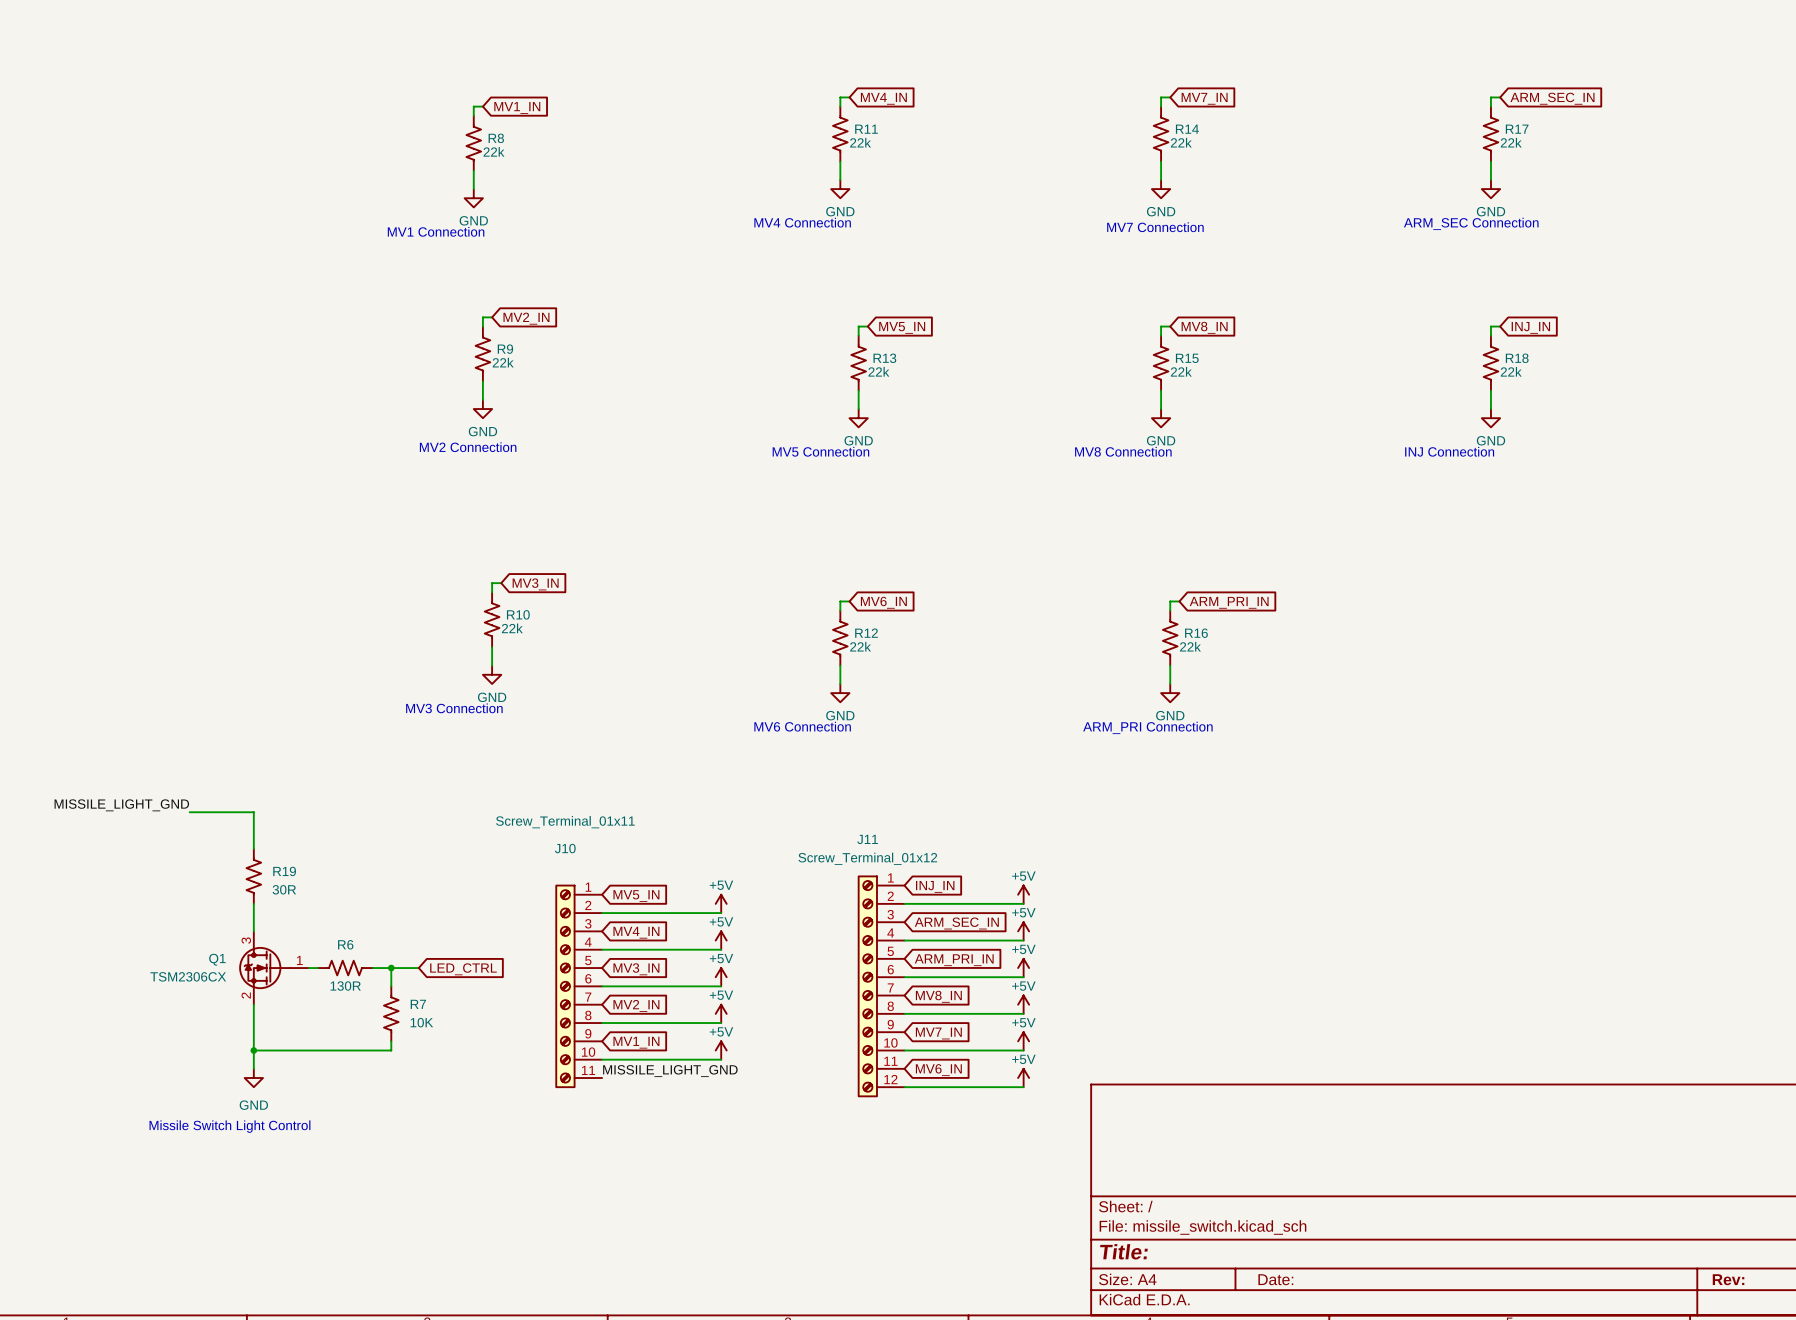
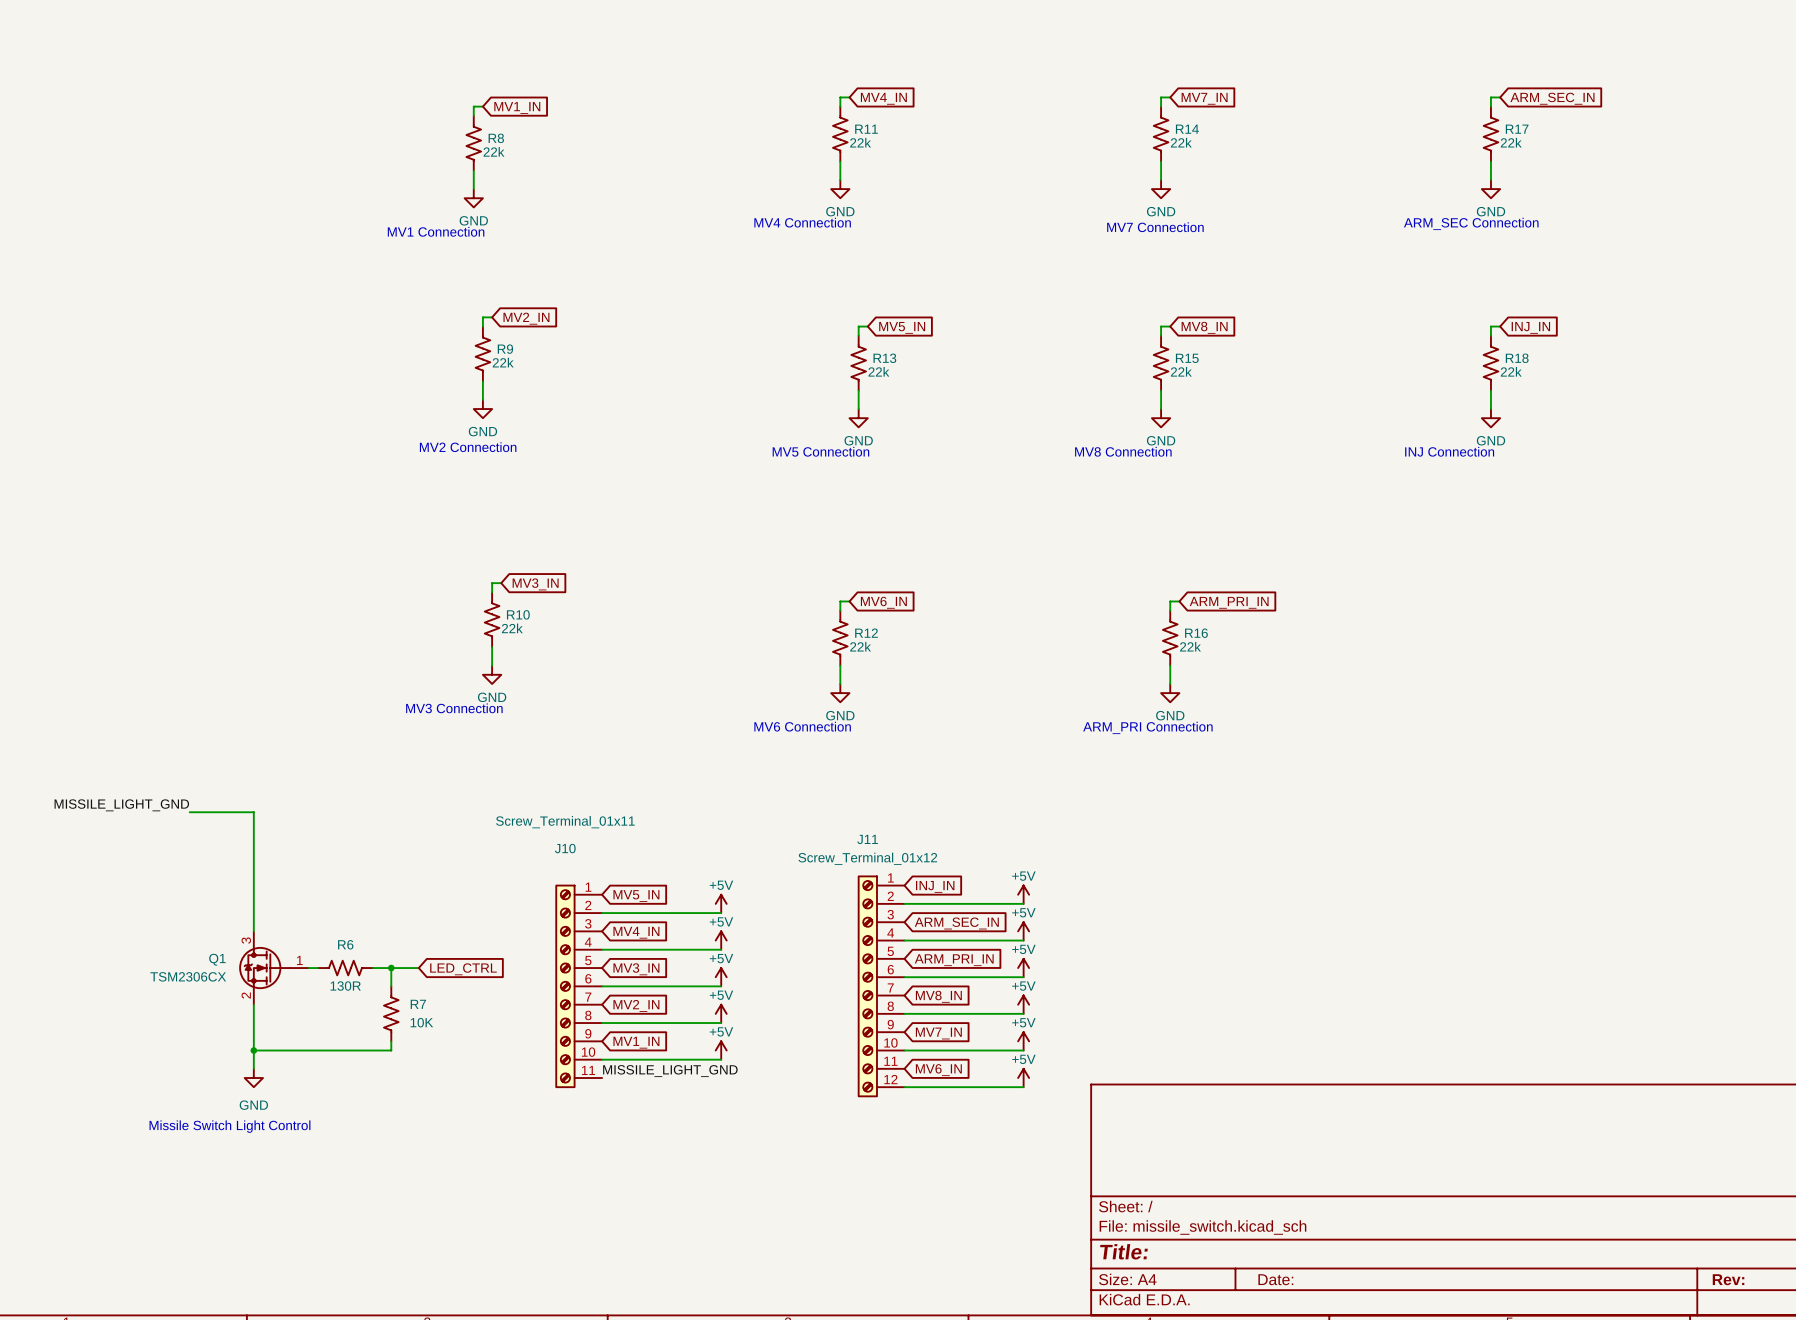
R19: 30R (253, 876) -> none

